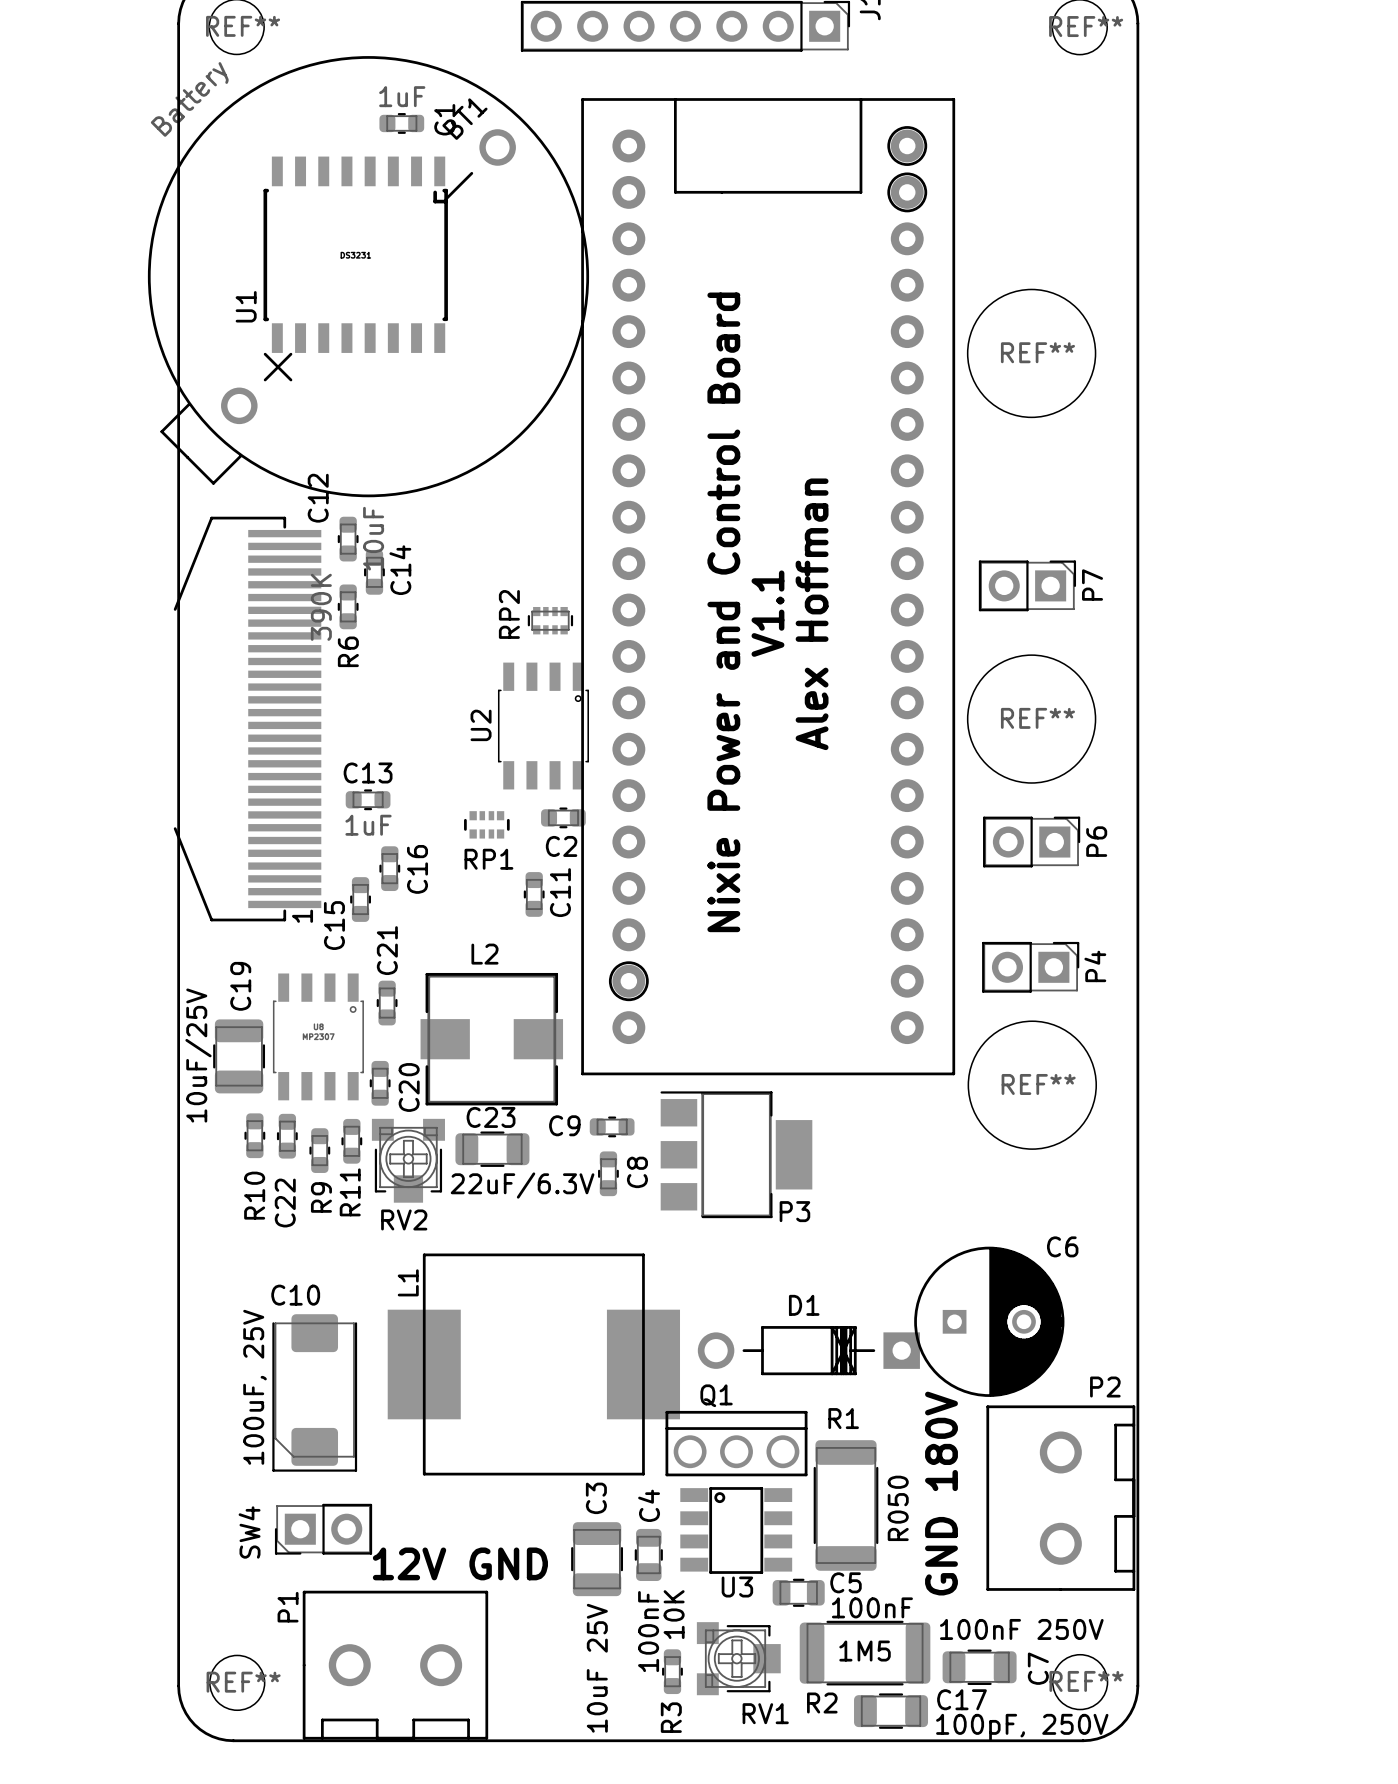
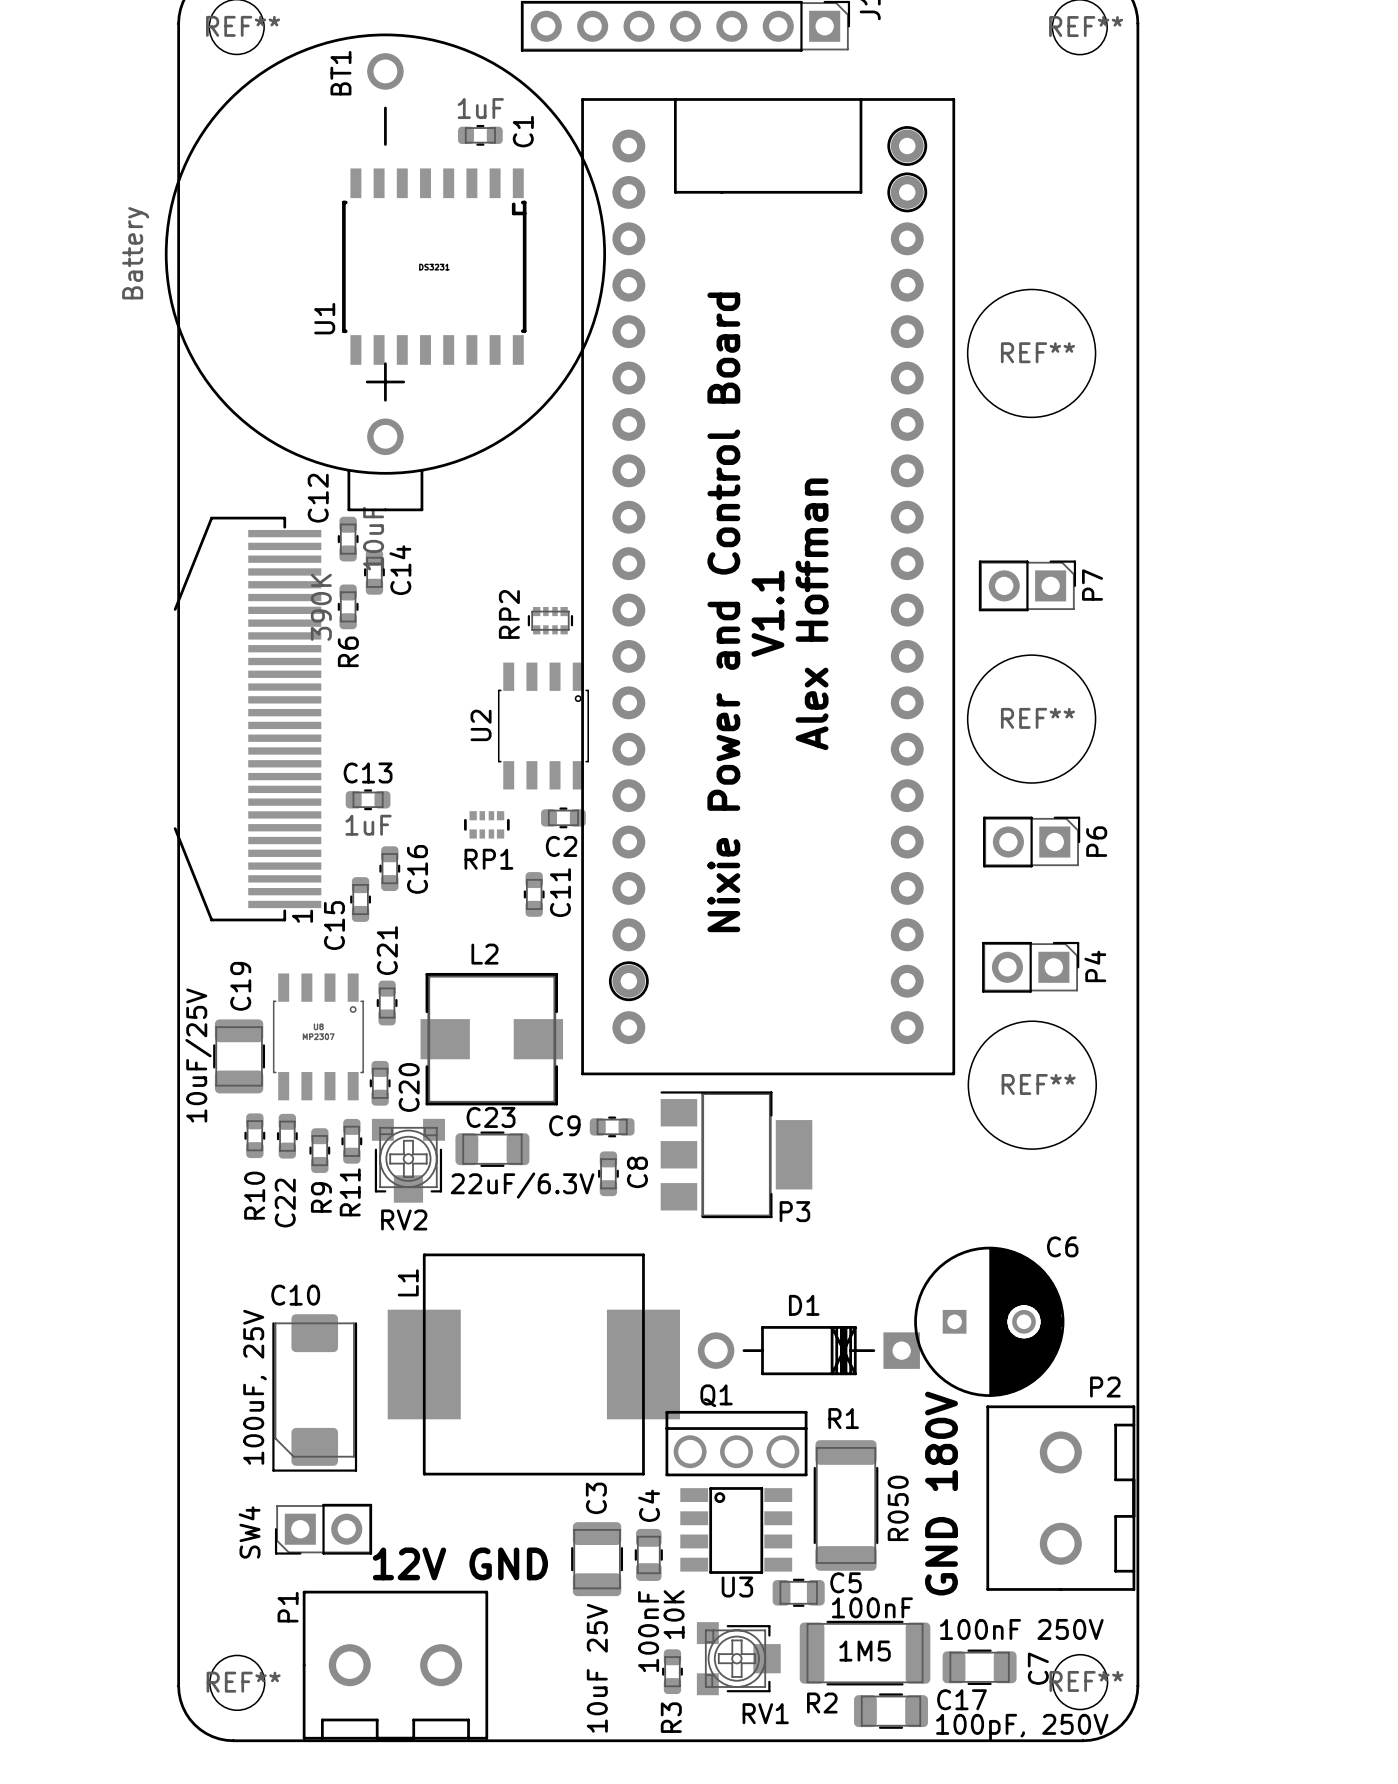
C1 position: (401, 123) -> (480, 135)
U1 position: (355, 254) -> (434, 266)
BT1 rotation: 0° (368, 276) -> 45° counterclockwise (385, 272)

